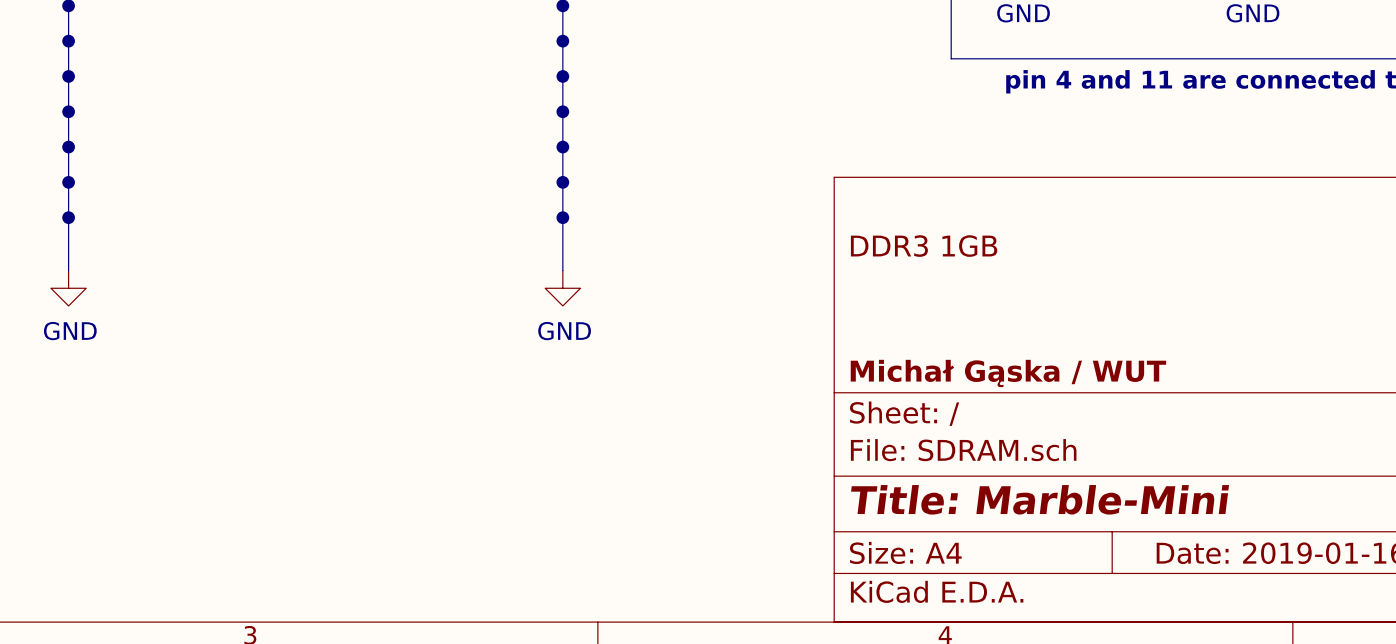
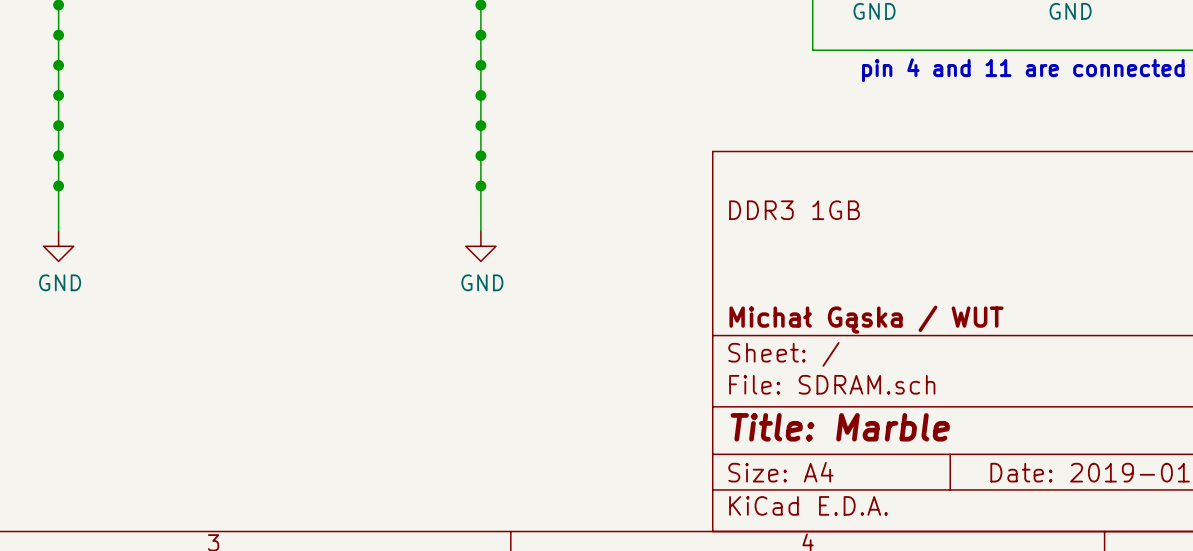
title block: Title: Marble-Mini (1040, 499) -> Title: Marble (840, 427)

